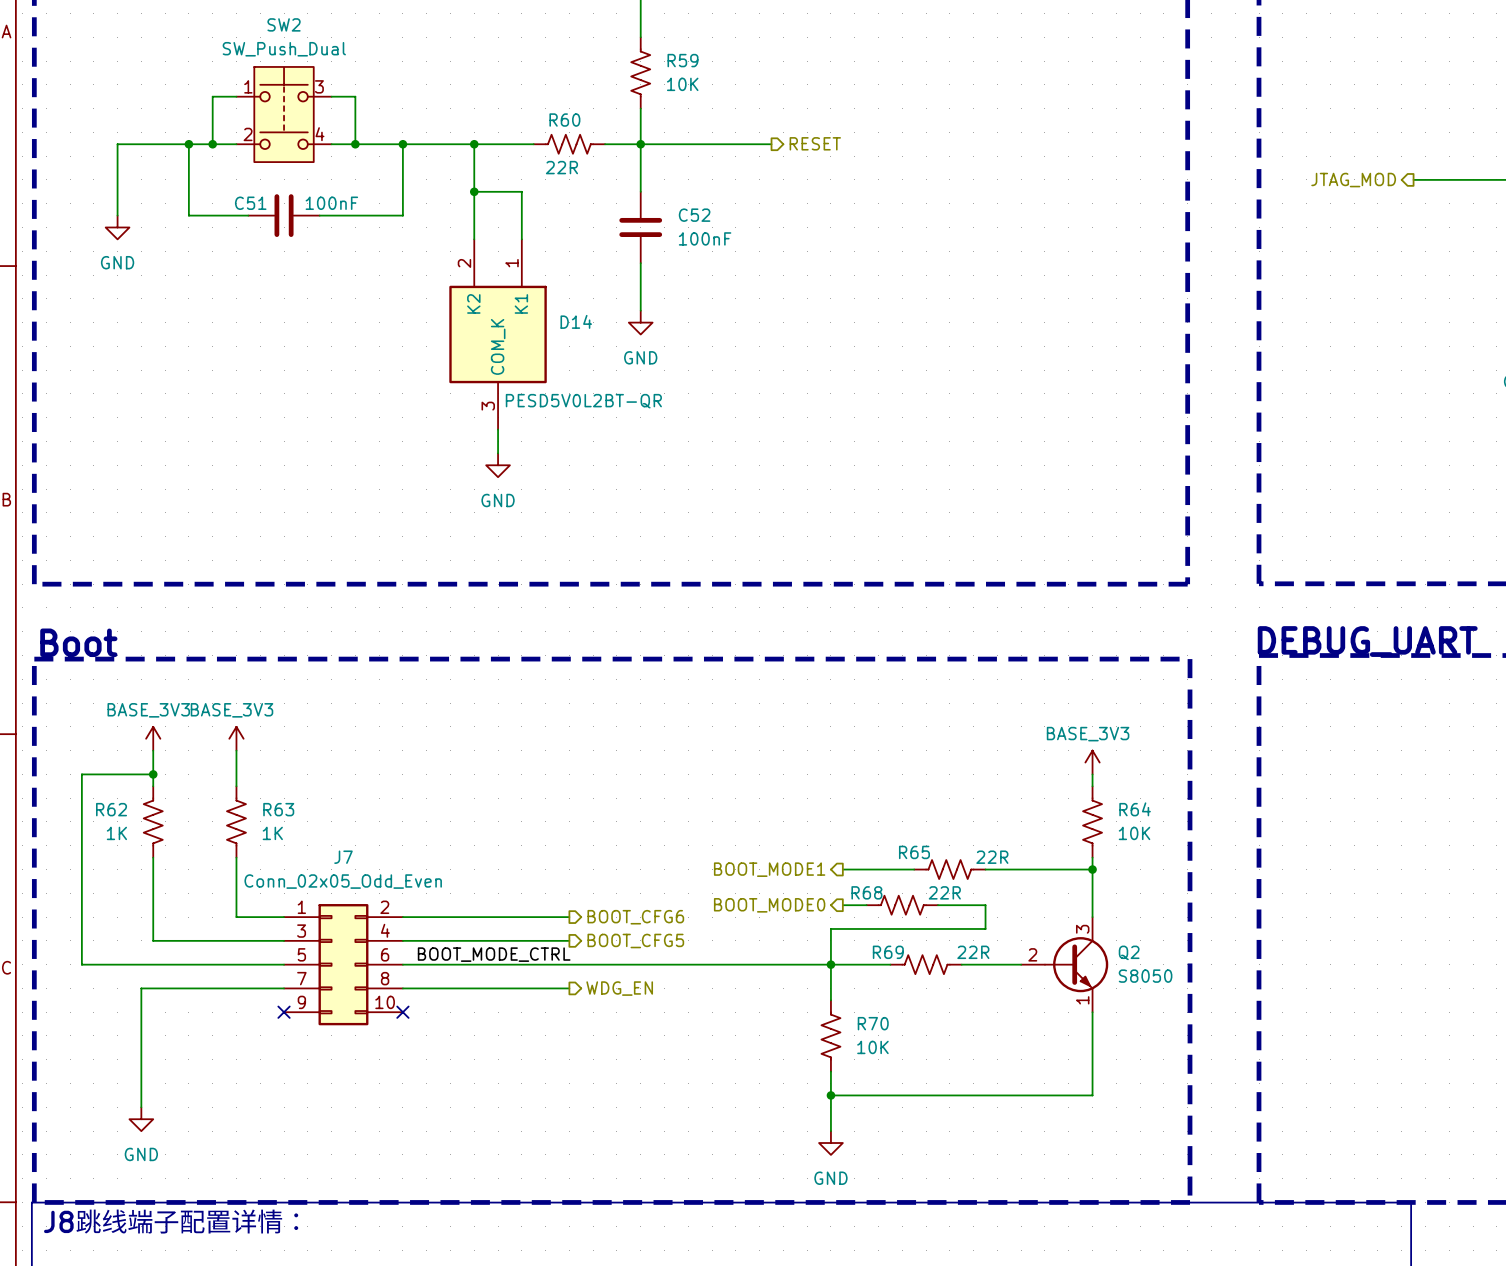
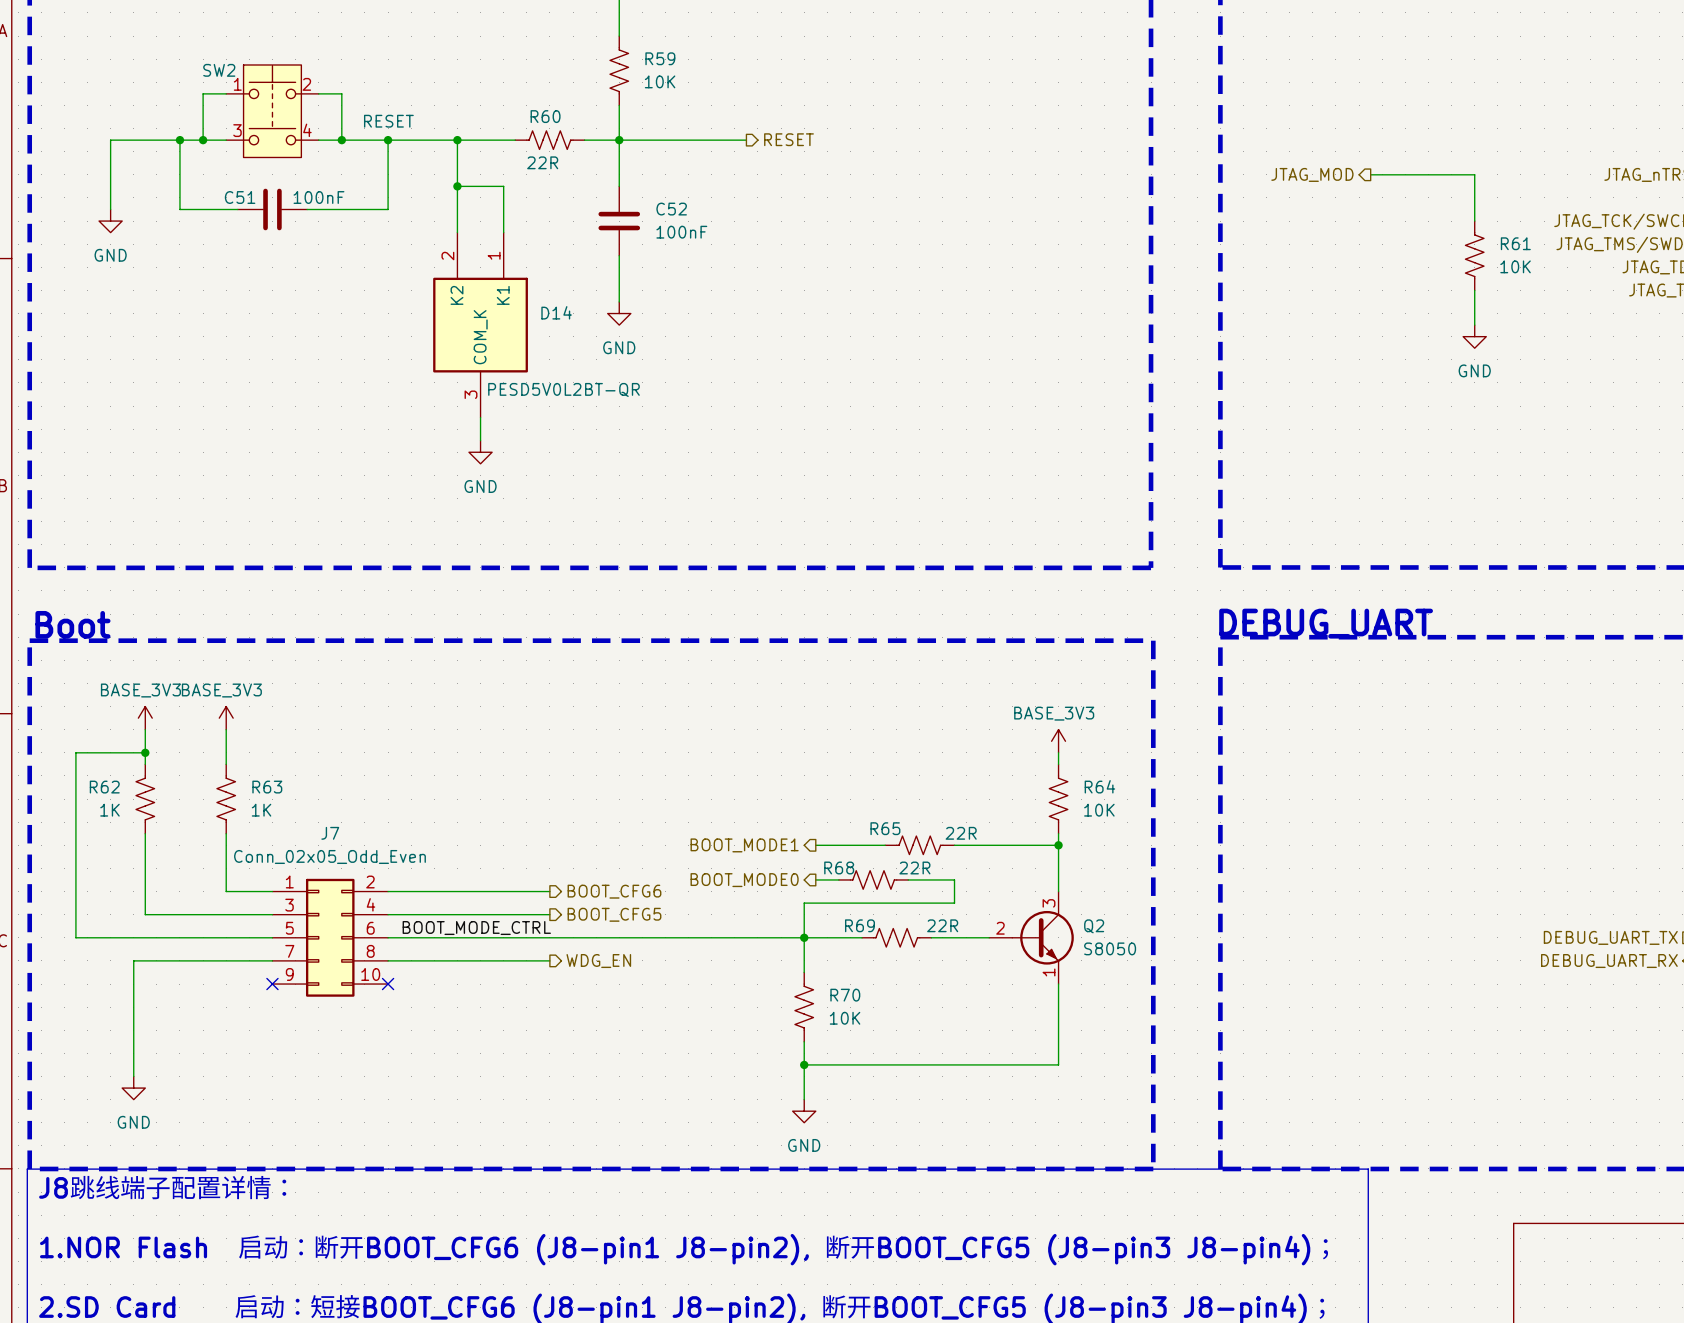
SW2 name position: SW2 (284, 24) -> SW2 (219, 70)
SW2 value: SW_Push_Dual (284, 49) -> RESET (388, 121)
SW2 pin number: 3 (319, 86) -> 2 (306, 84)
SW2 pin number: 2 (248, 134) -> 3 (237, 130)

